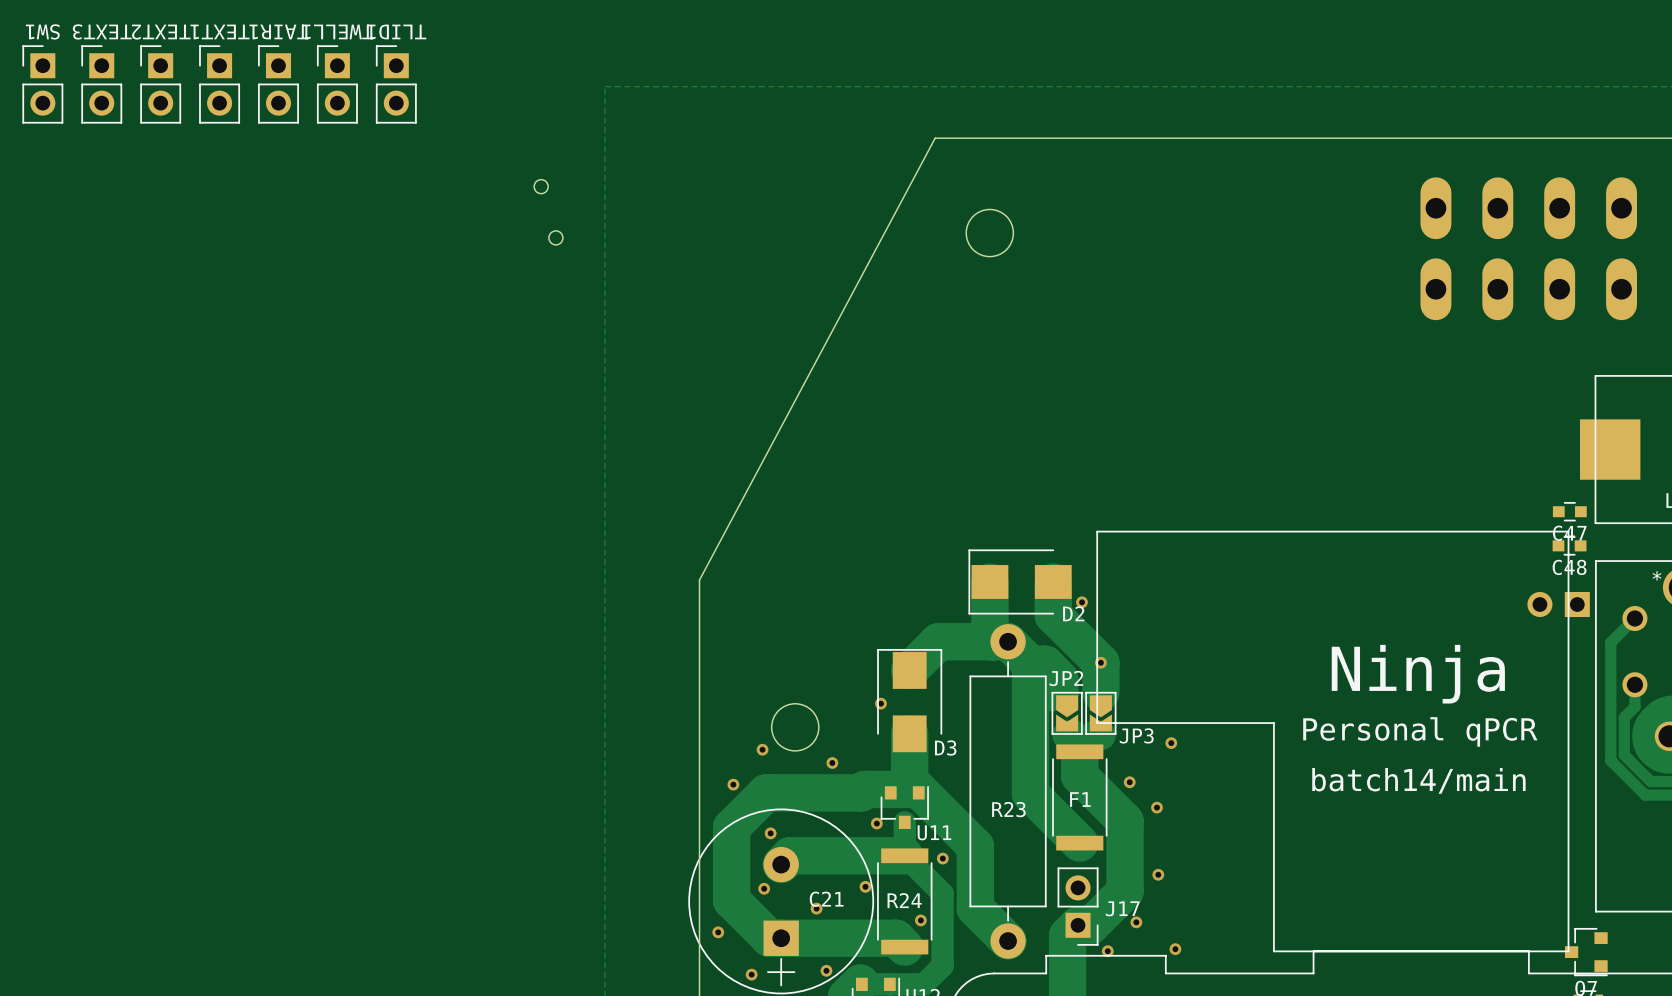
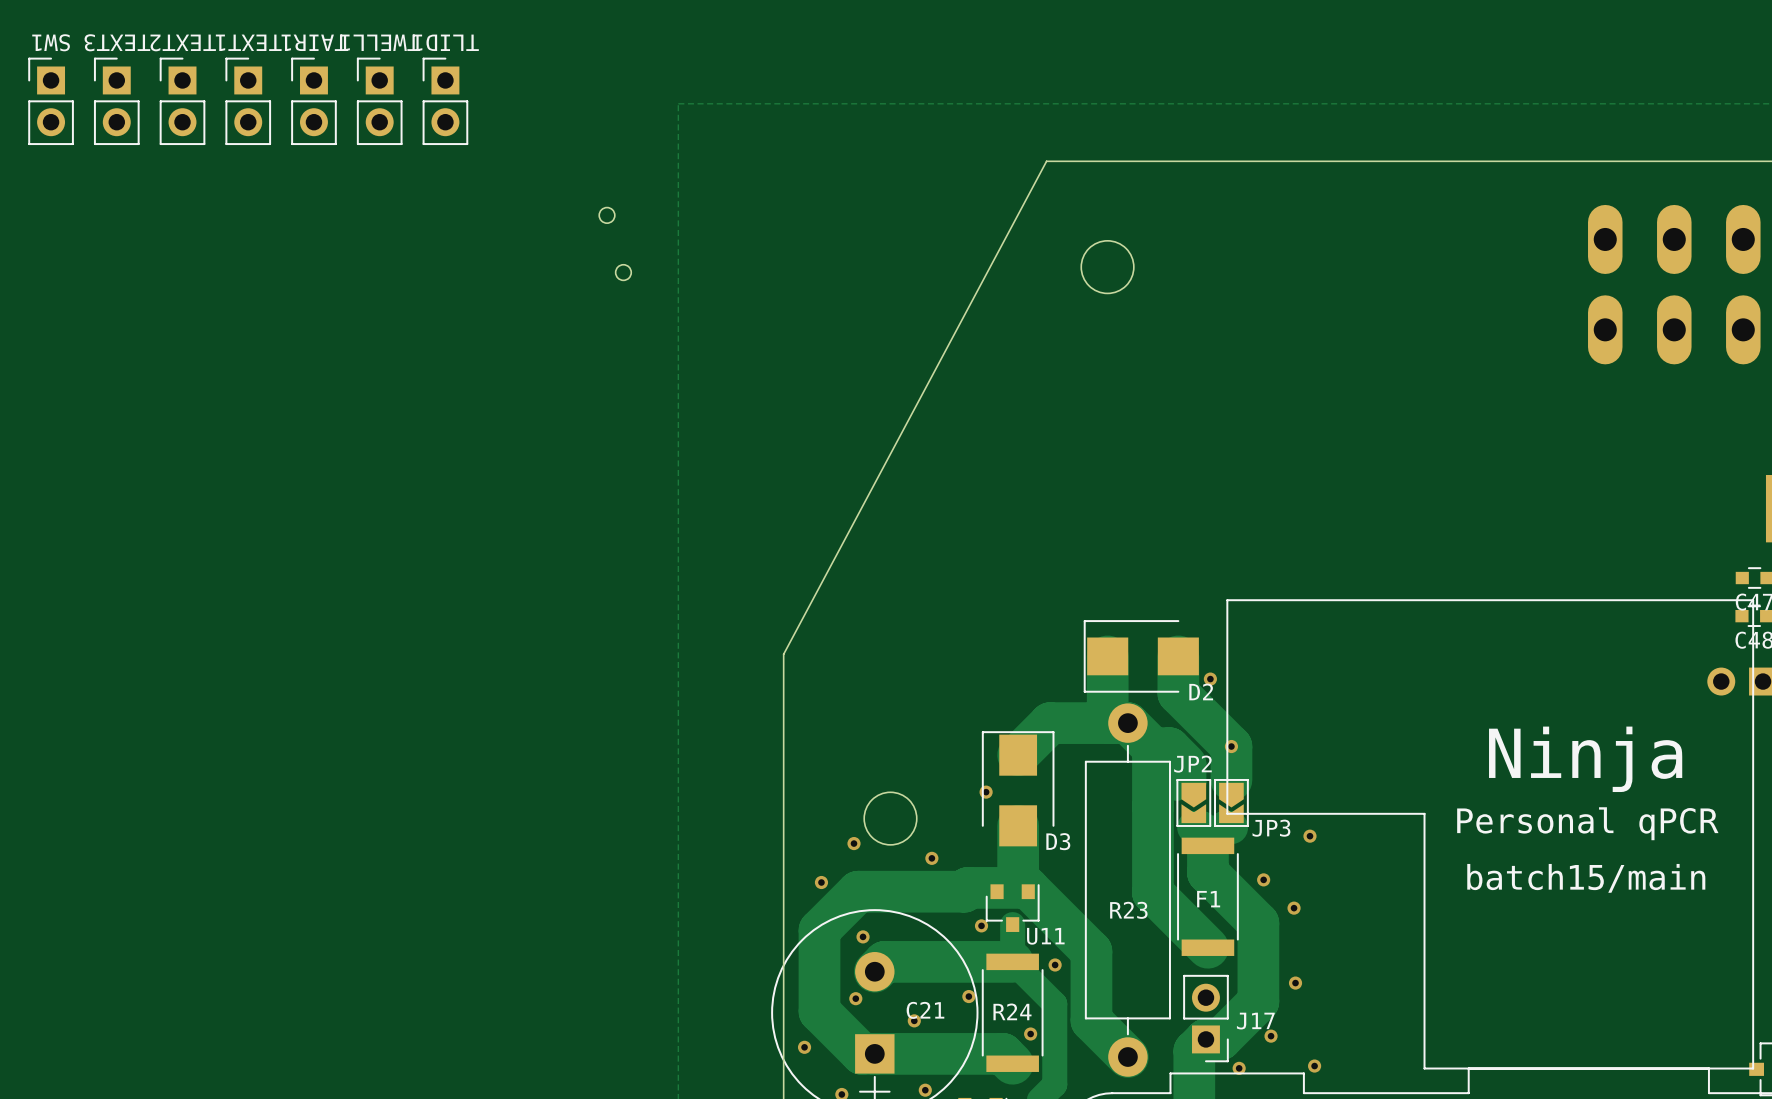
text: batch14/main (1418, 780) -> batch15/main (1586, 878)

